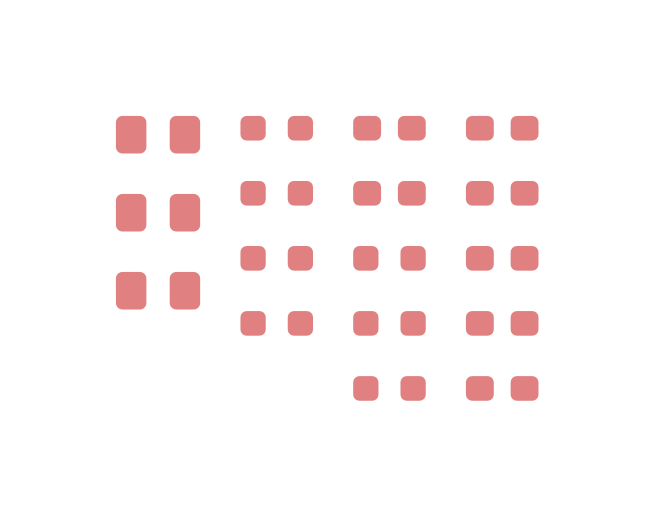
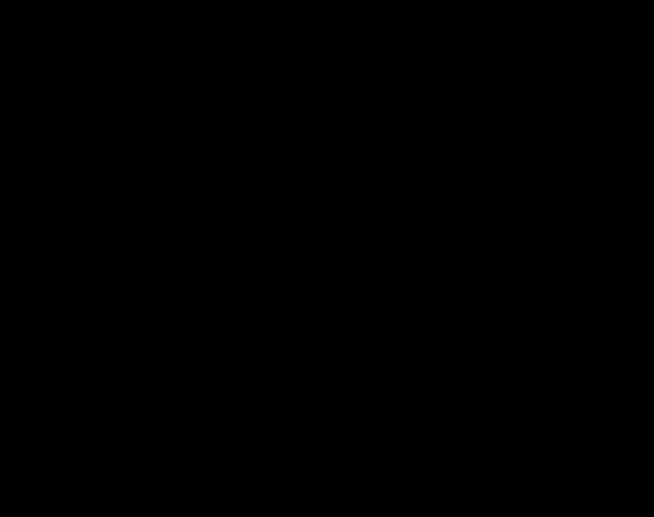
part: (276, 128) -> none
part: (389, 128) -> none
part: (502, 128) -> none
part: (158, 134) -> none
part: (276, 193) -> none
part: (389, 193) -> none
part: (502, 193) -> none
part: (158, 212) -> none
part: (276, 258) -> none
part: (389, 258) -> none
part: (502, 258) -> none
part: (158, 290) -> none
part: (276, 323) -> none
part: (389, 323) -> none
part: (502, 323) -> none
part: (389, 388) -> none
part: (502, 388) -> none

